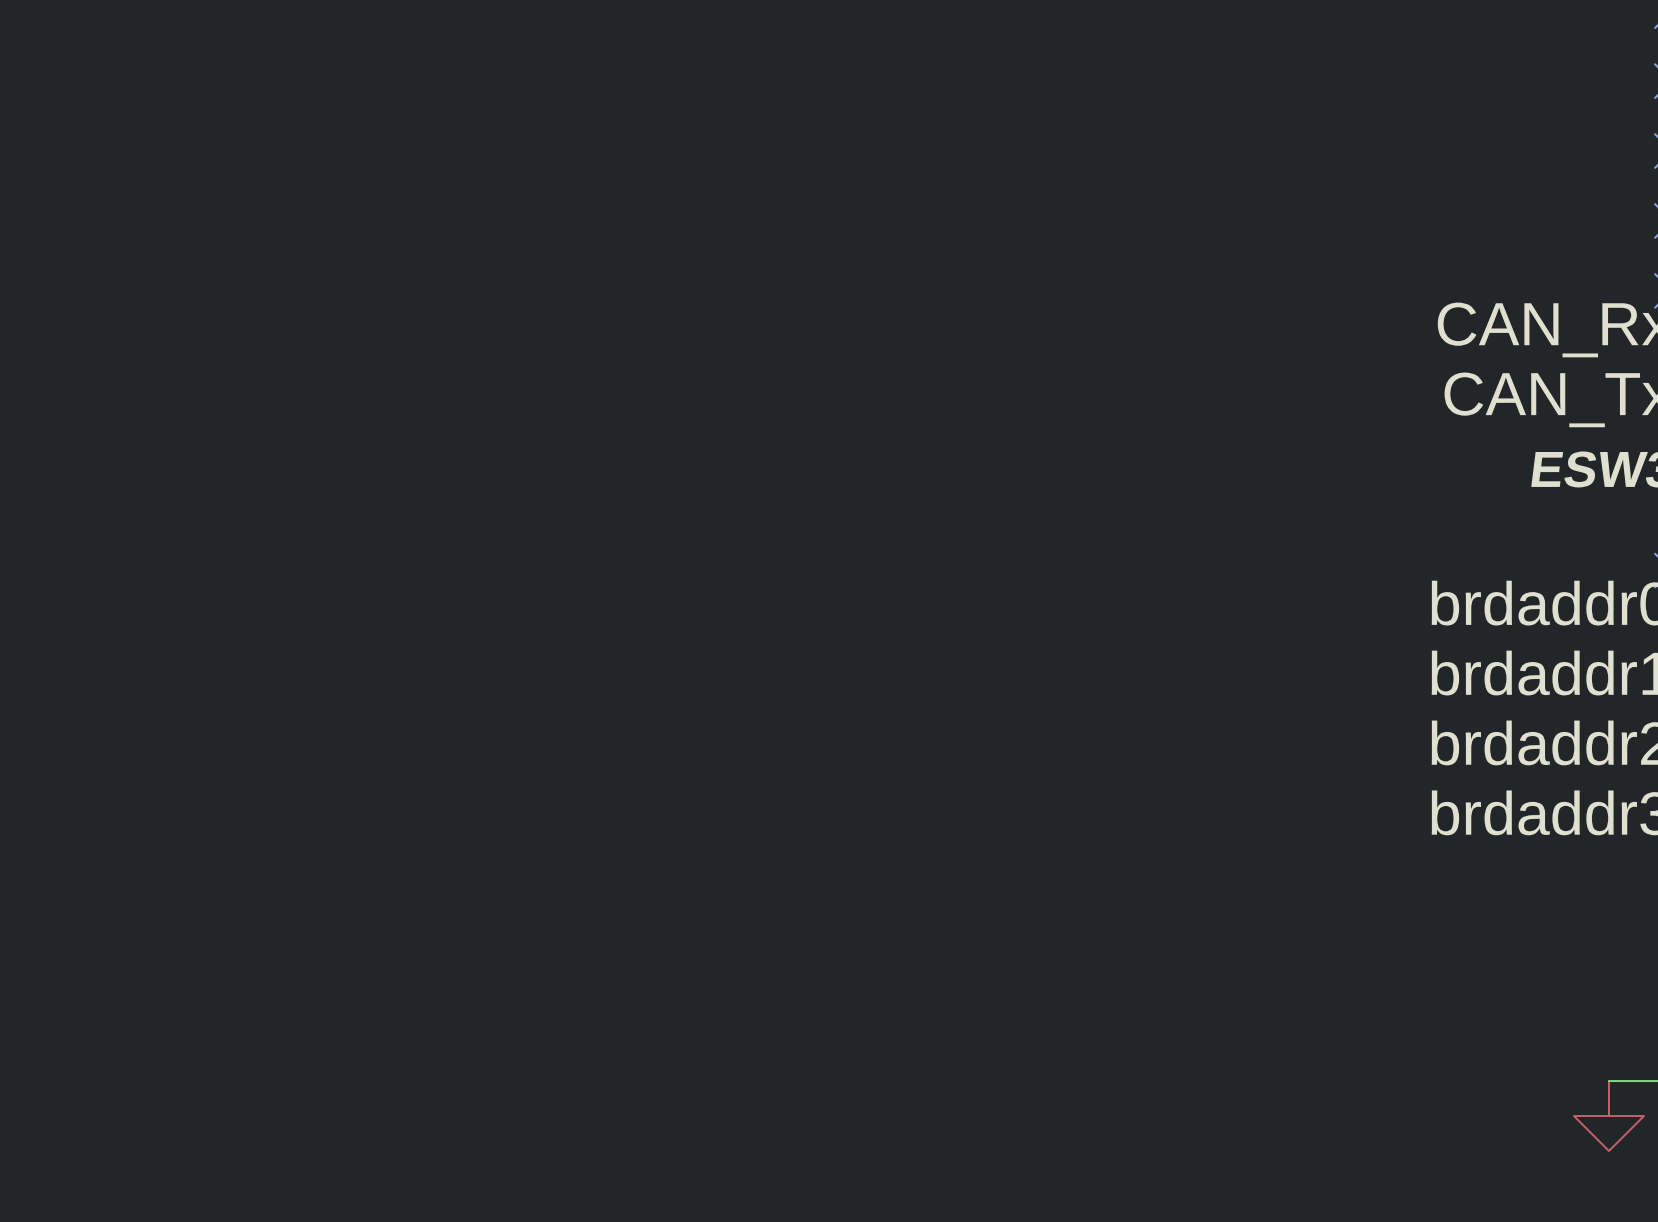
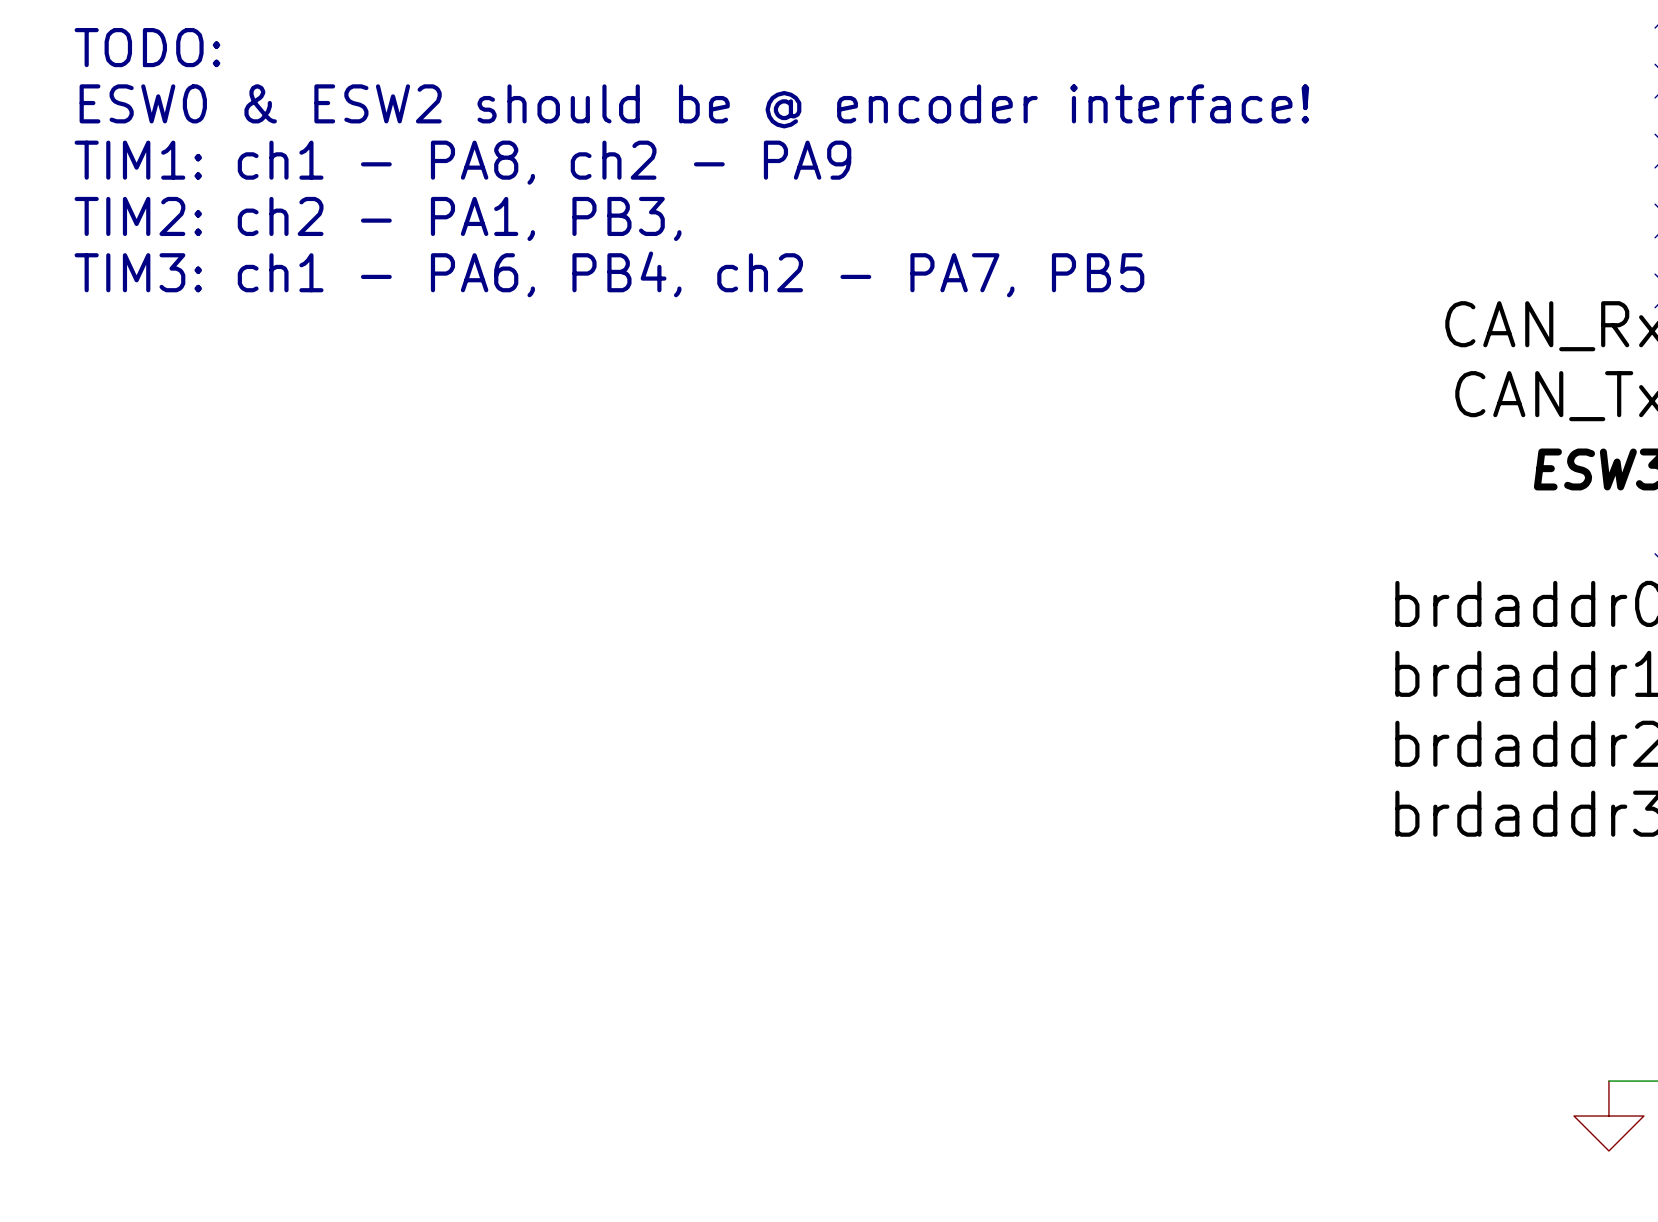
text: none -> TODO: (147, 47)
text: none -> ESW0 & ESW2 should be @ encoder interface! (694, 106)
text: none -> TIM1: ch1 - PA8, ch2 - PA9 (462, 162)
text: none -> TIM2: ch2 - PA1, PB3, (378, 218)
text: none -> TIM3: ch1 - PA6, PB4, ch2 - PA7, PB5 (609, 274)

